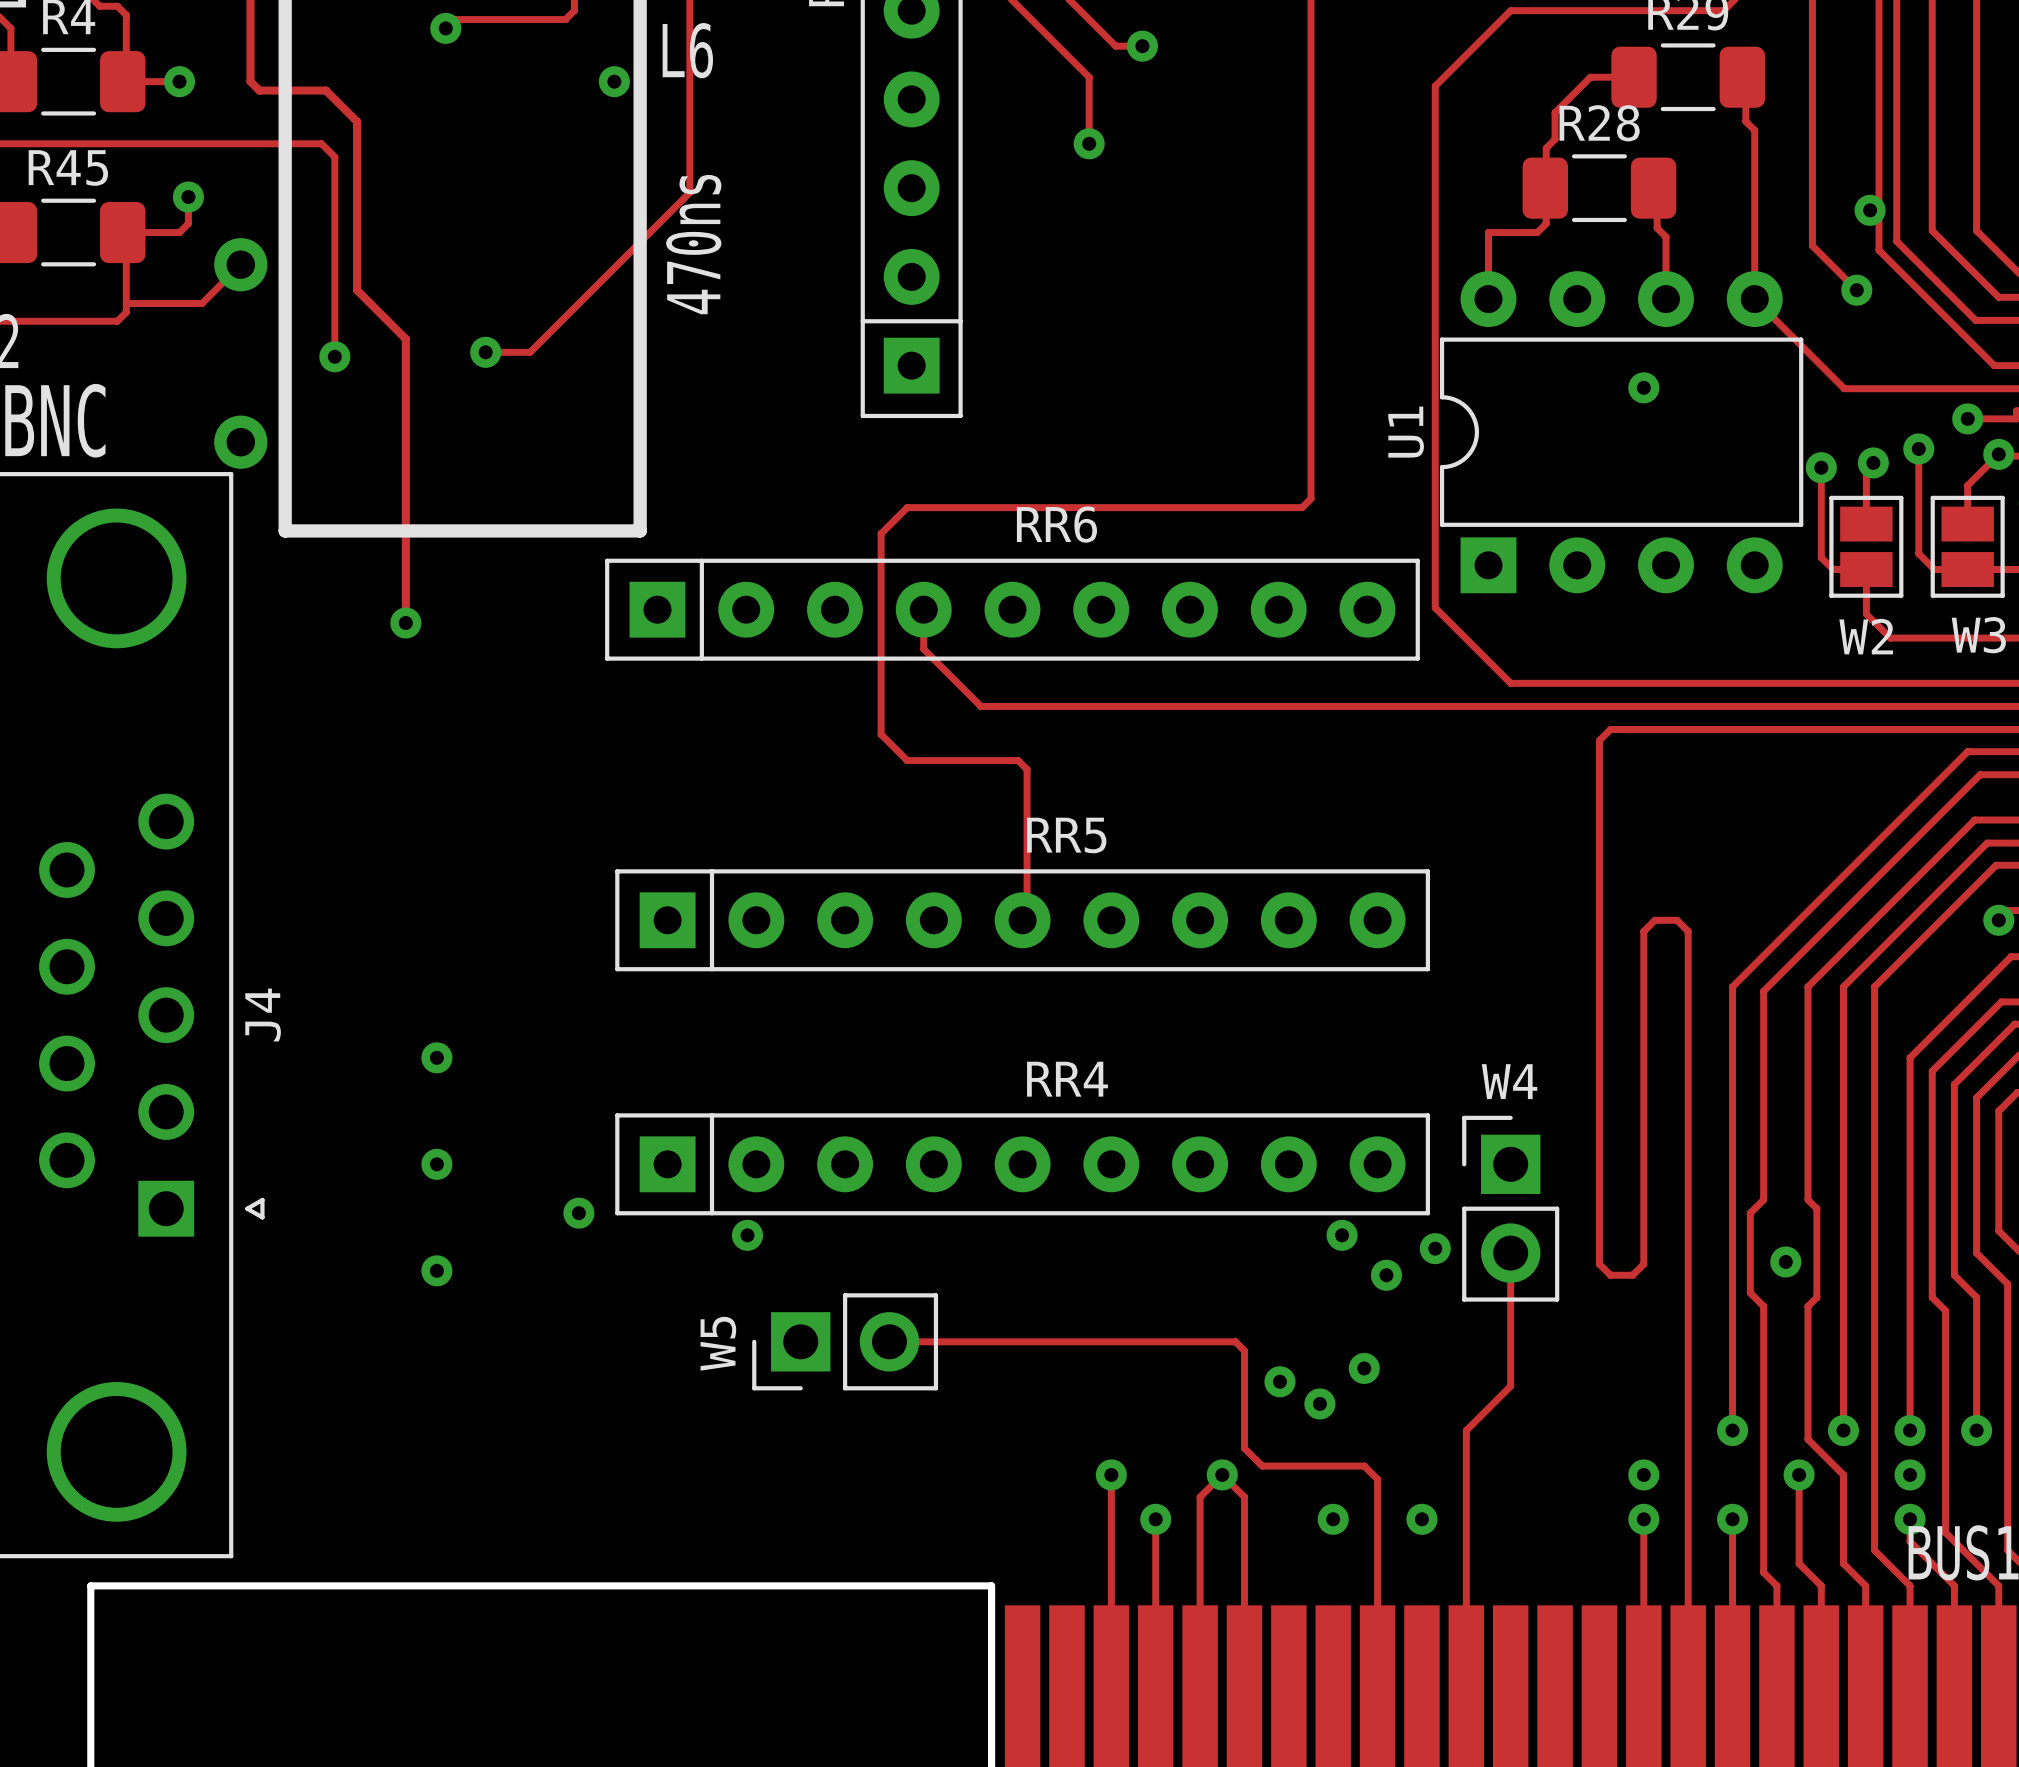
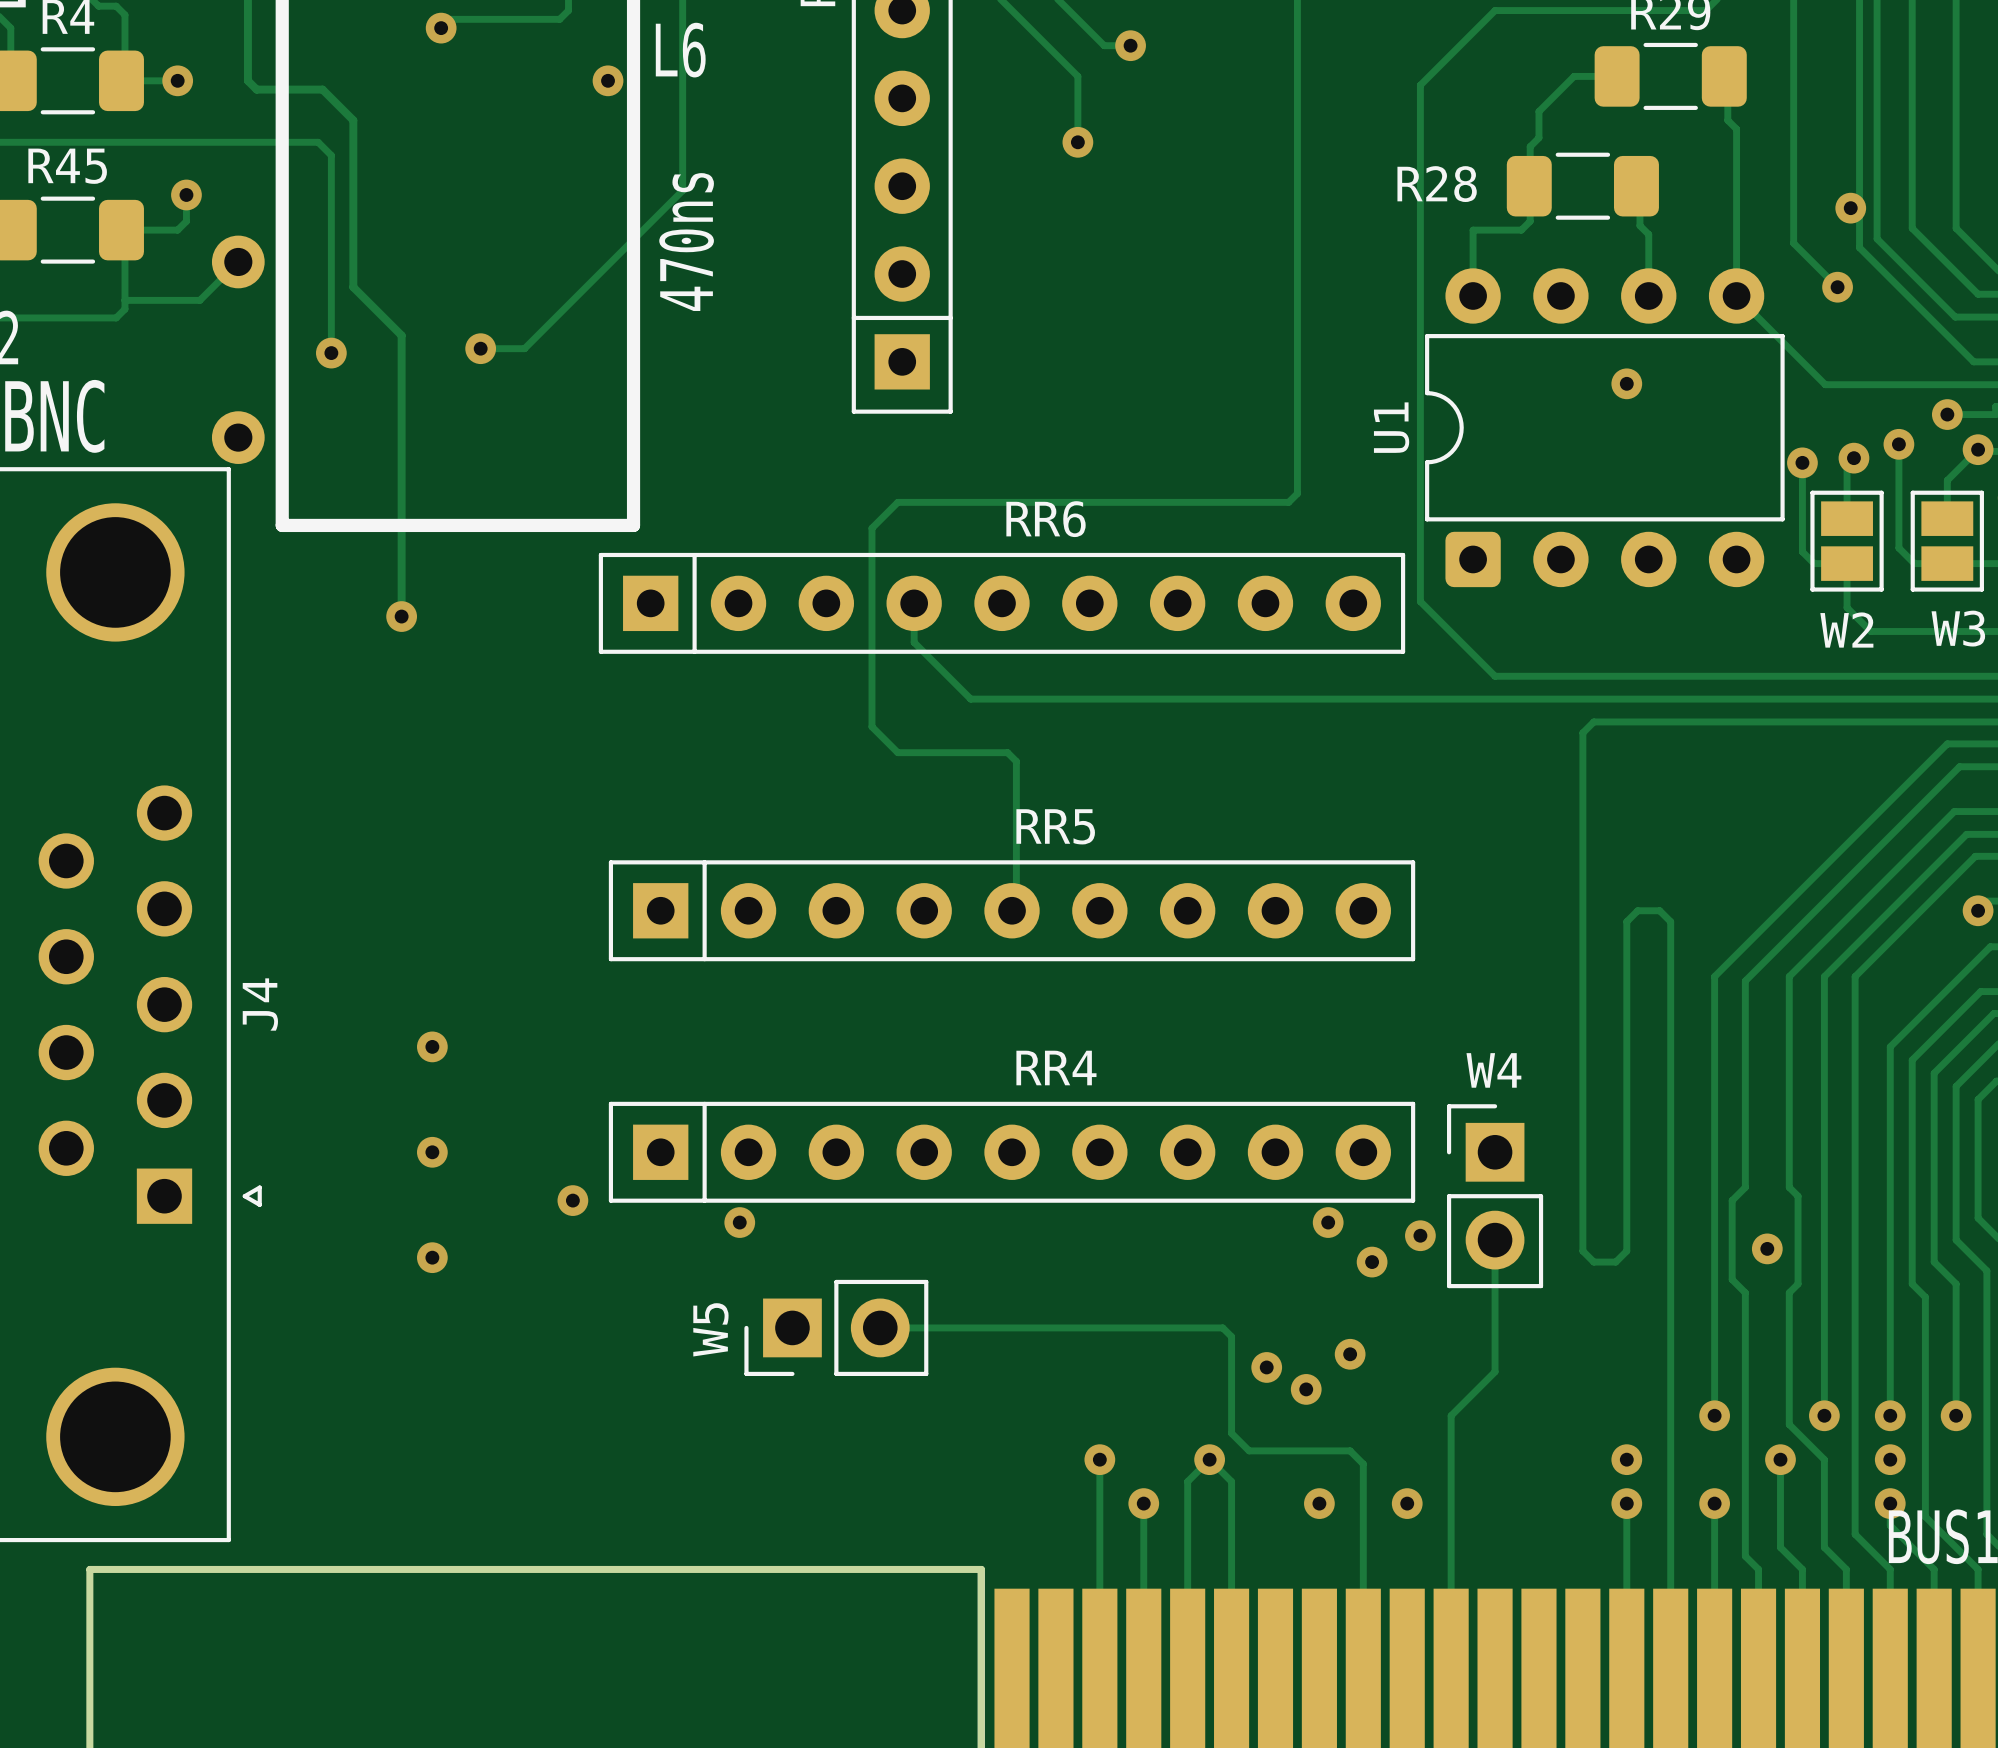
R28 name position: R28 (1599, 123) -> R28 (1437, 184)
U1 footprint: [1439, 271, 1804, 594] -> [1425, 268, 1785, 588]

